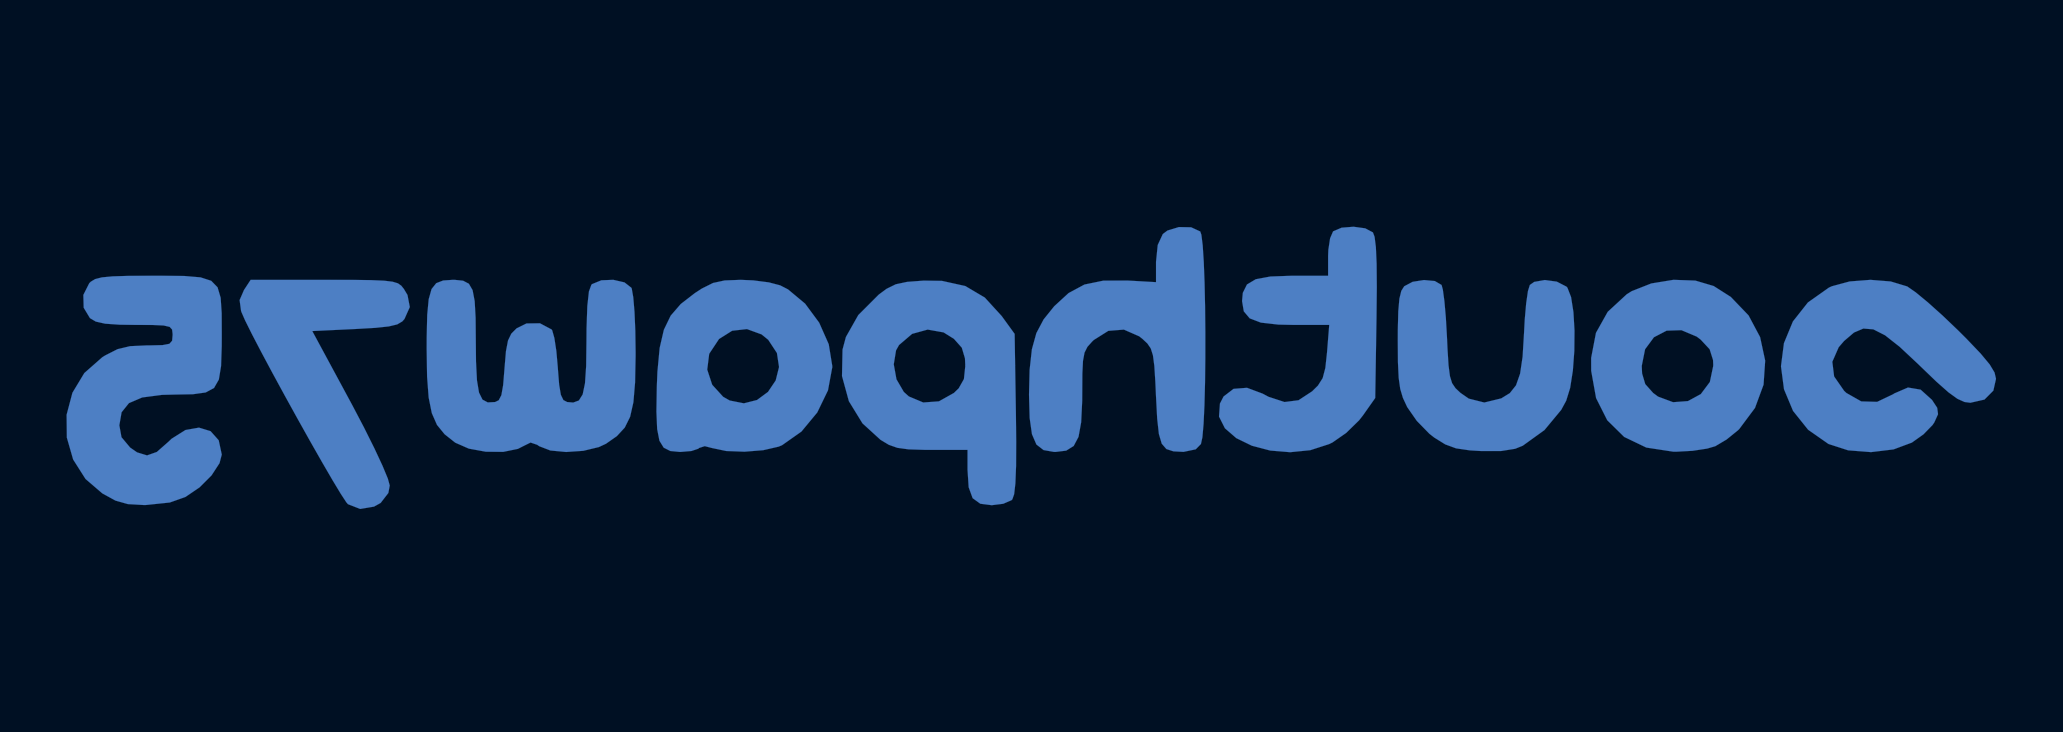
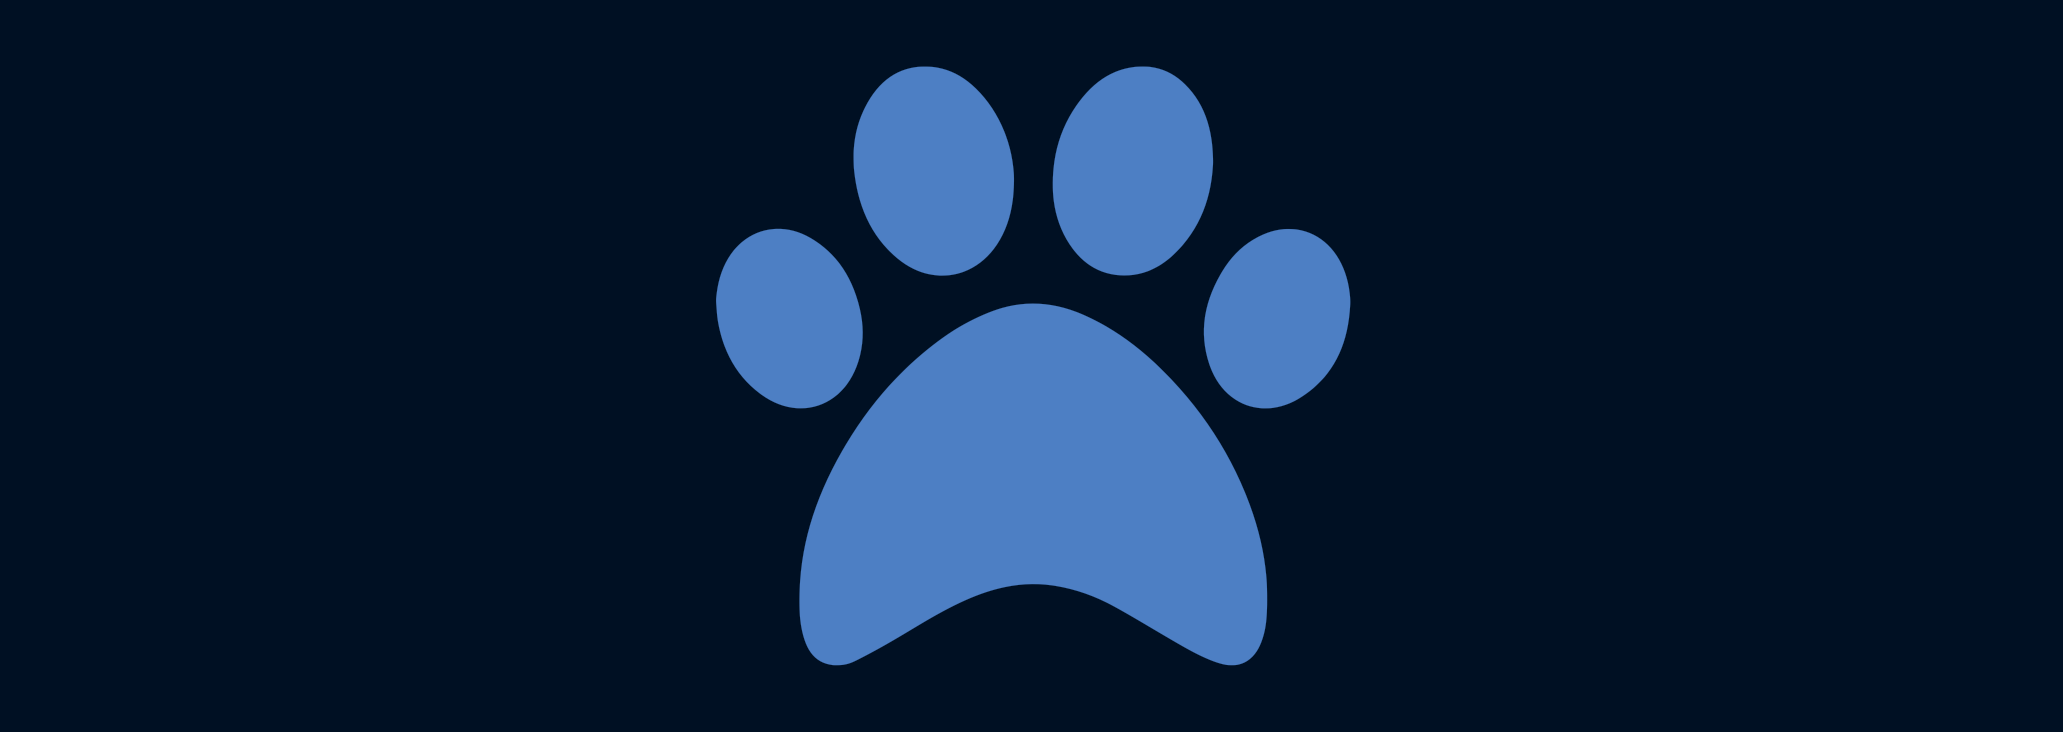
drawing shape: [66, 226, 1997, 510] -> [716, 66, 1351, 666]

